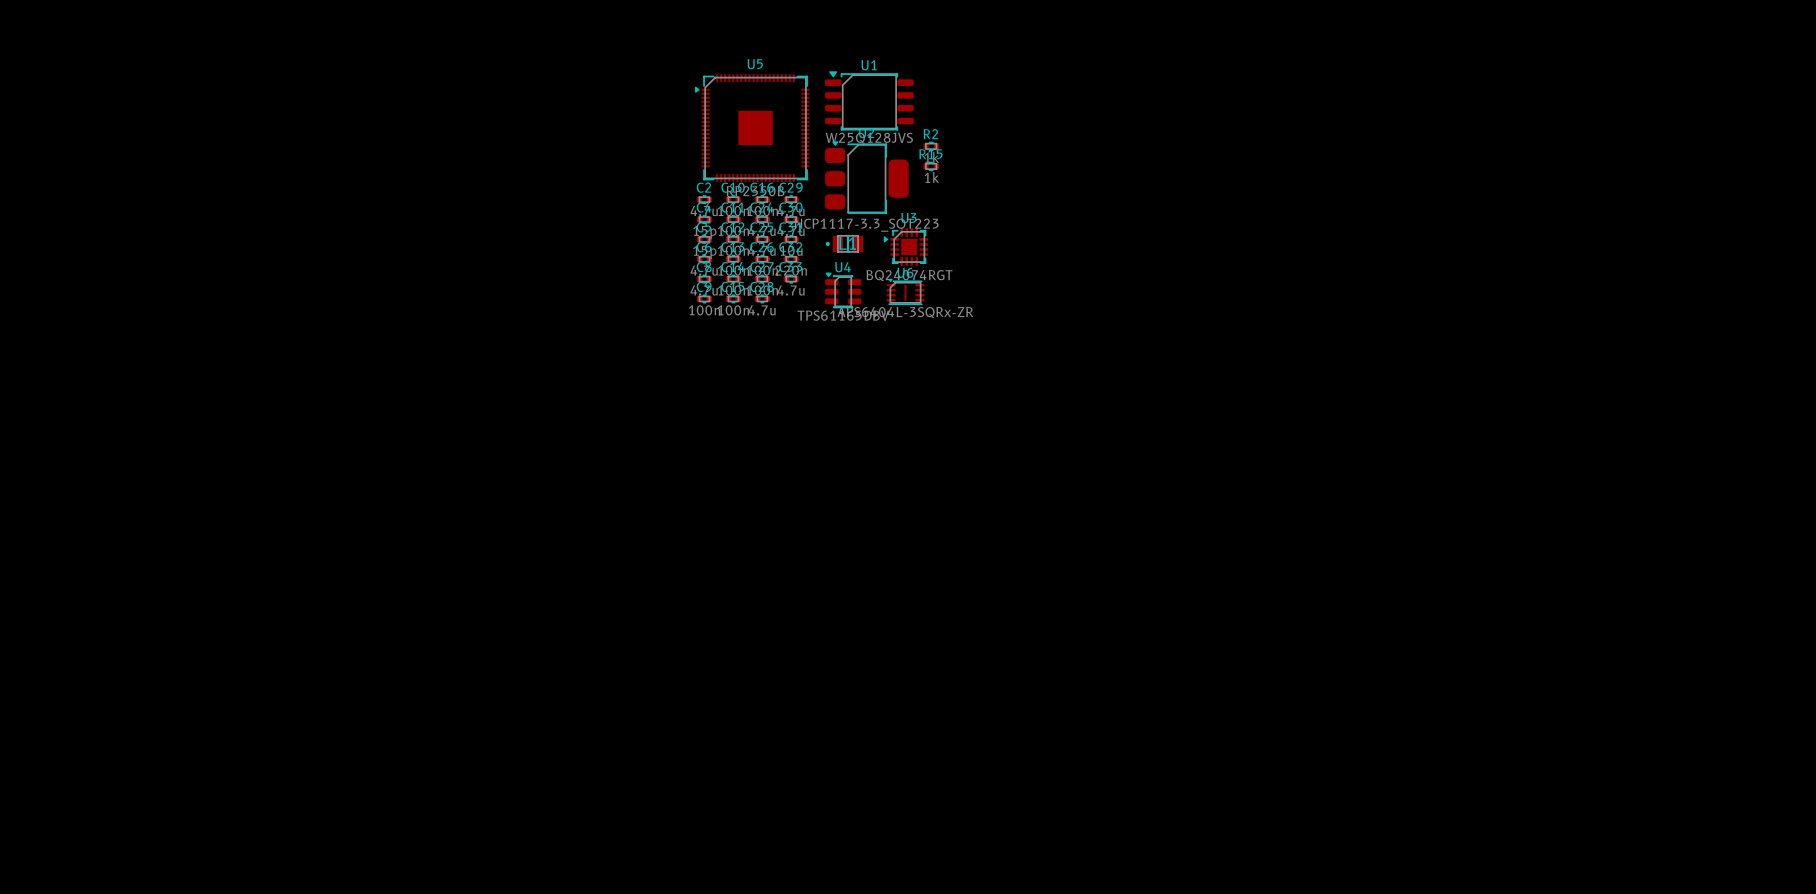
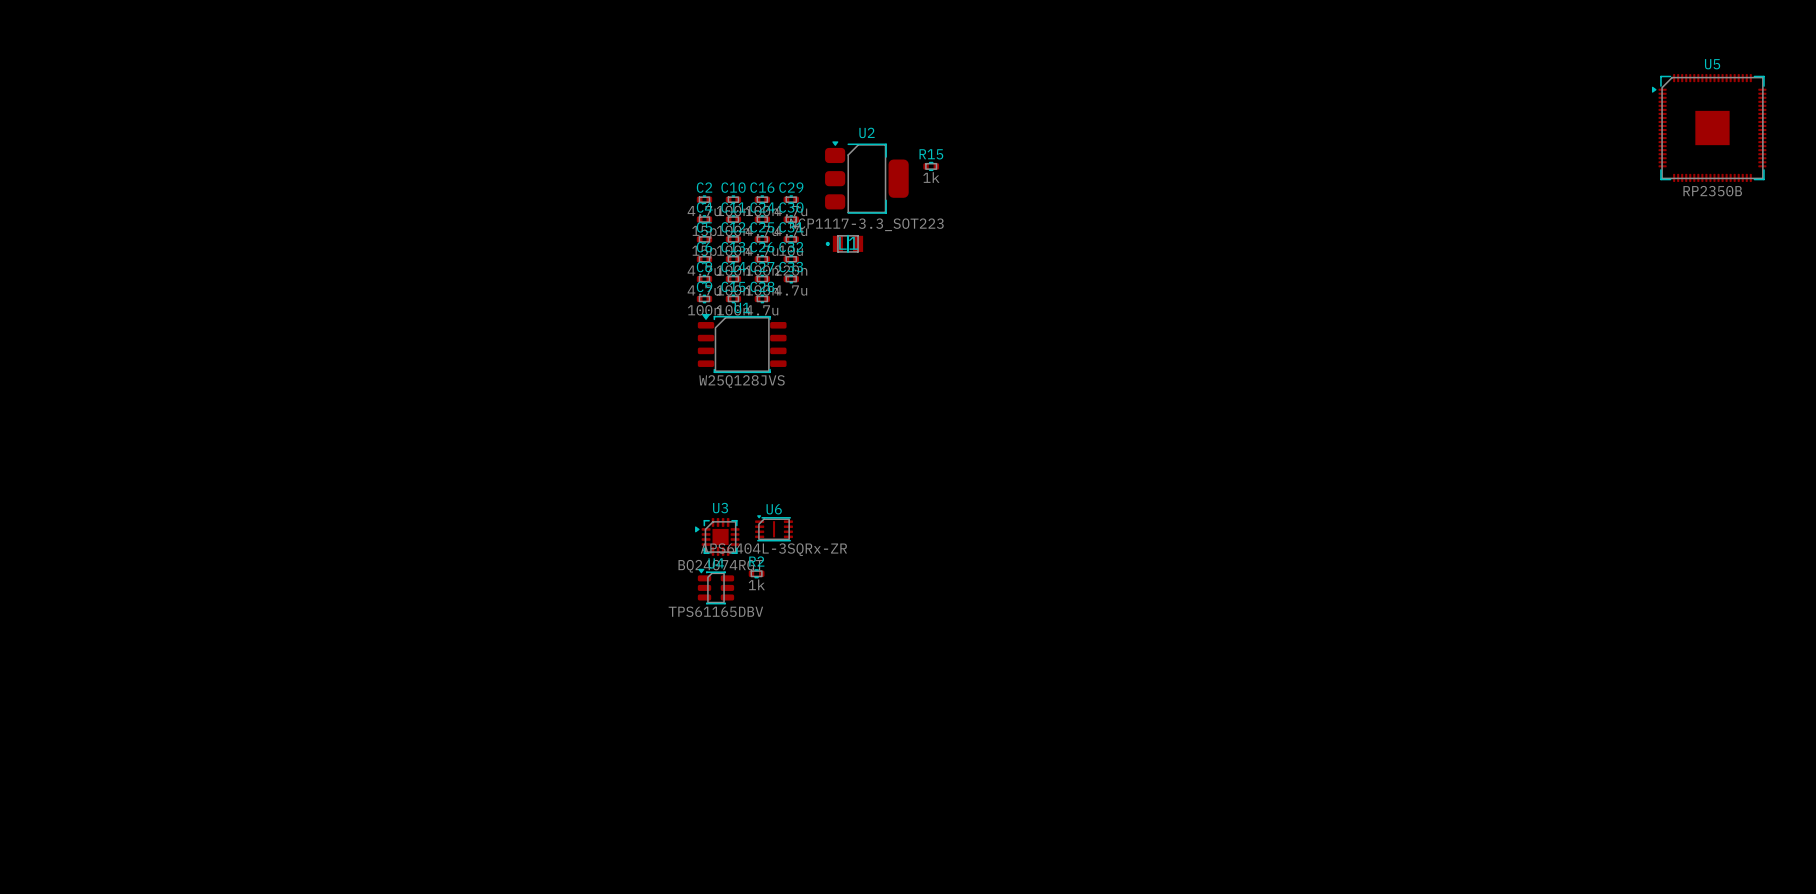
U1 position: (869, 100) -> (742, 343)
U5 position: (752, 128) -> (1709, 128)
R2 position: (931, 146) -> (756, 573)
U3 position: (905, 246) -> (717, 536)
U4 position: (843, 290) -> (715, 586)
U6 position: (905, 291) -> (774, 528)

